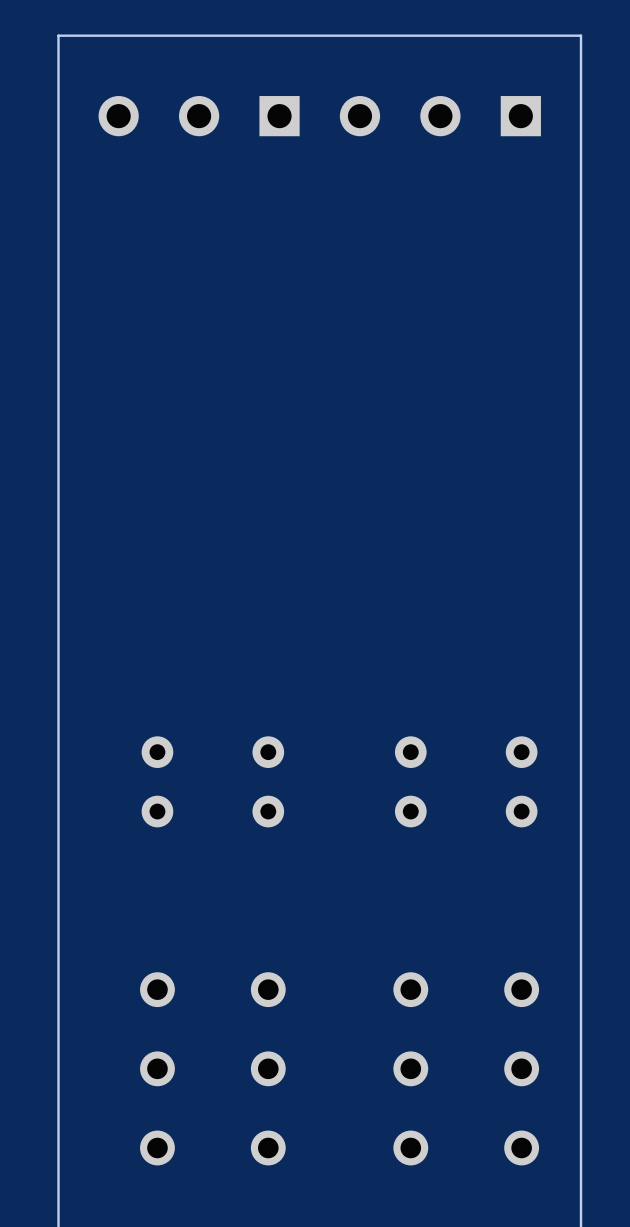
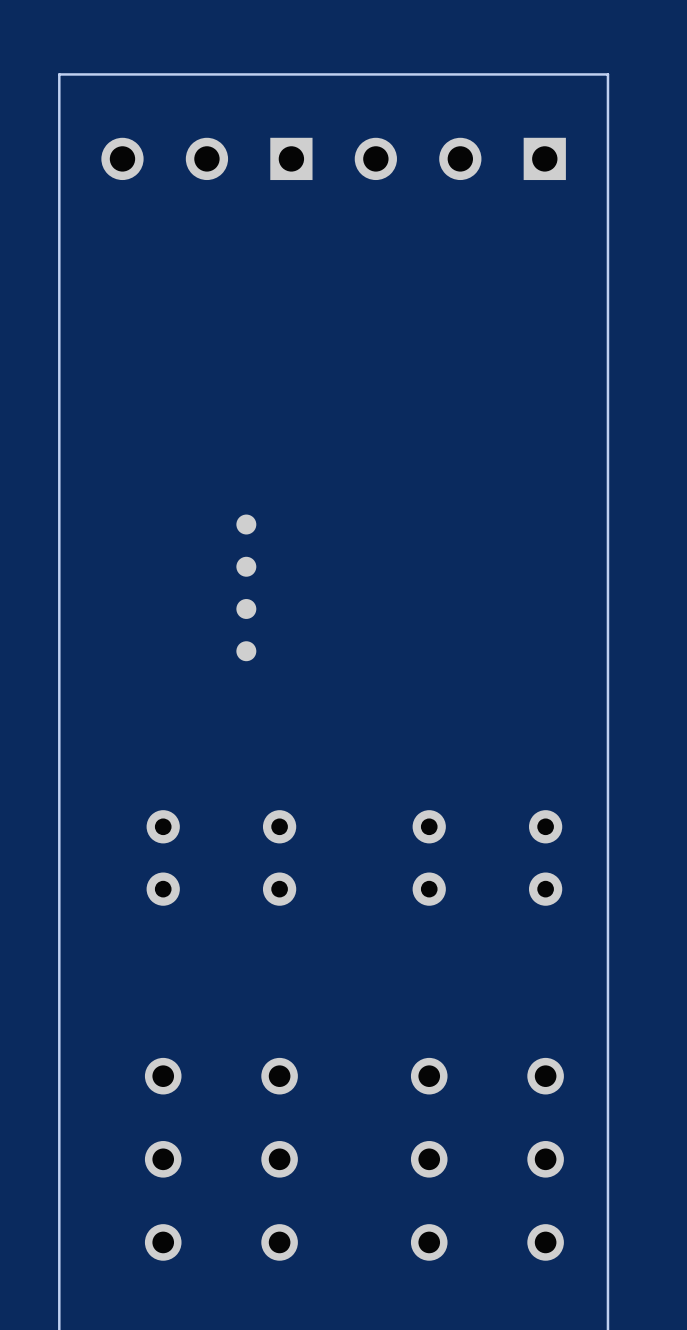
part: none -> (246, 524)
part: none -> (246, 566)
part: none -> (246, 608)
part: none -> (246, 651)

